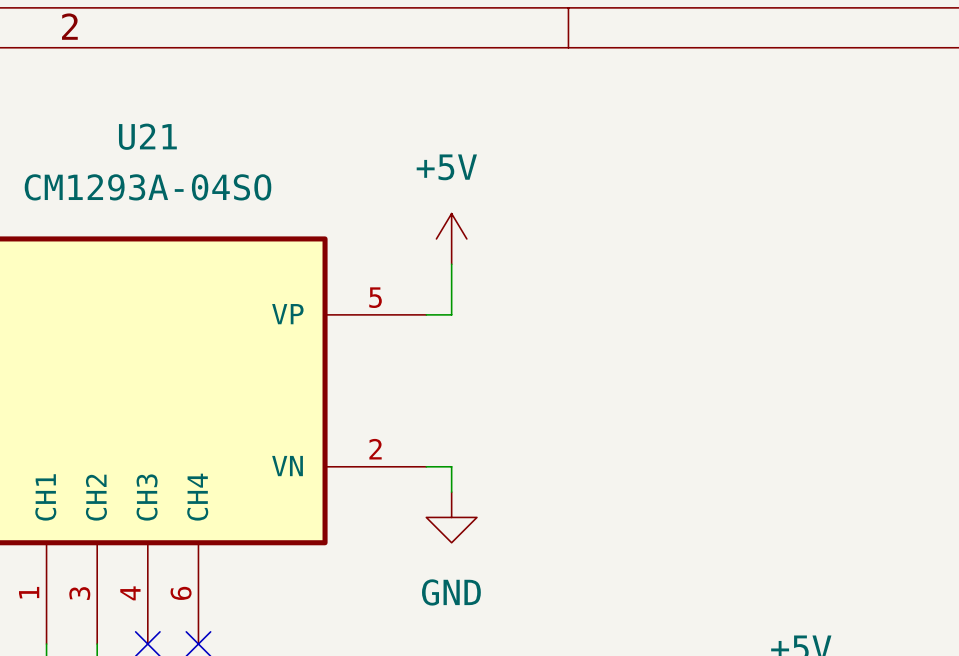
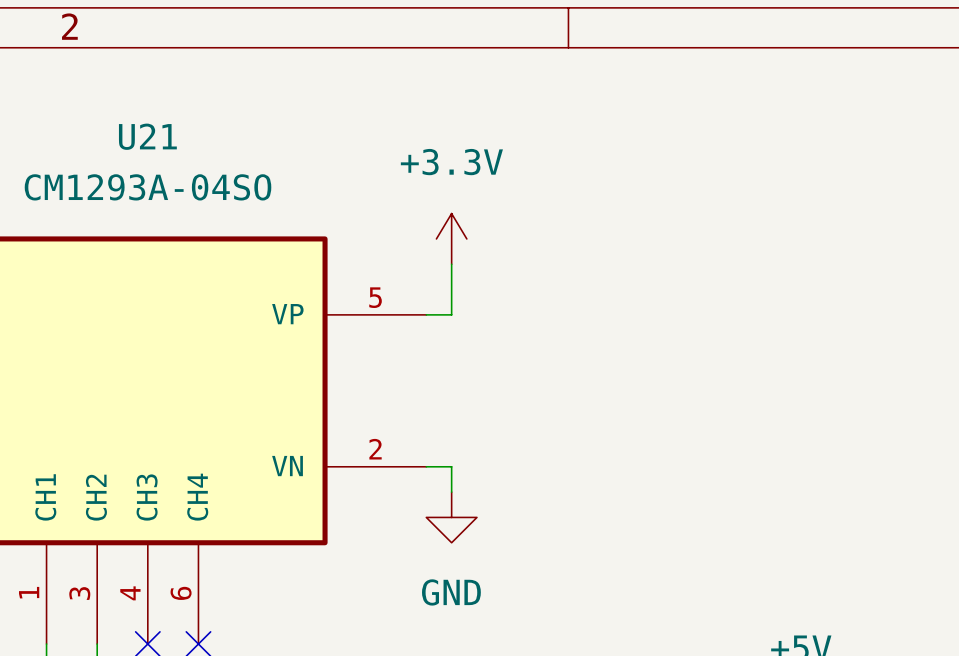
power symbol: +5V (451, 238) -> +3.3V (451, 238)

